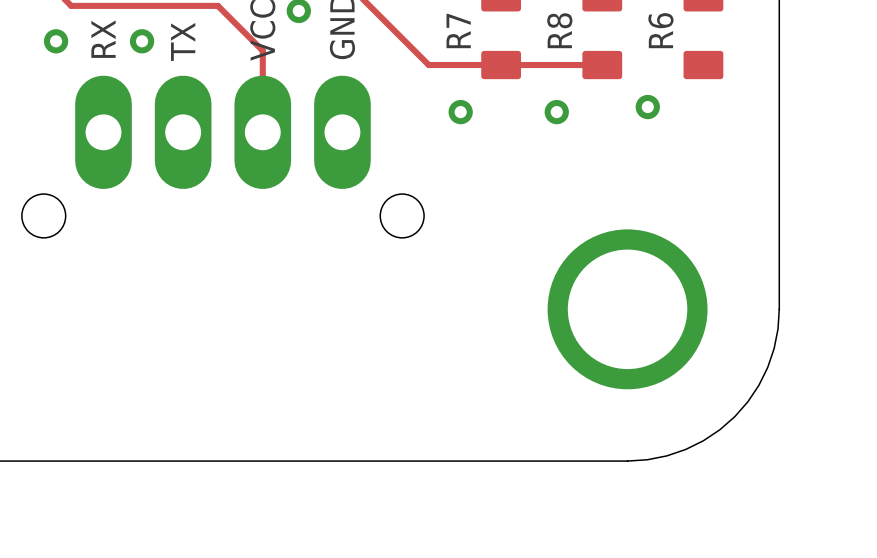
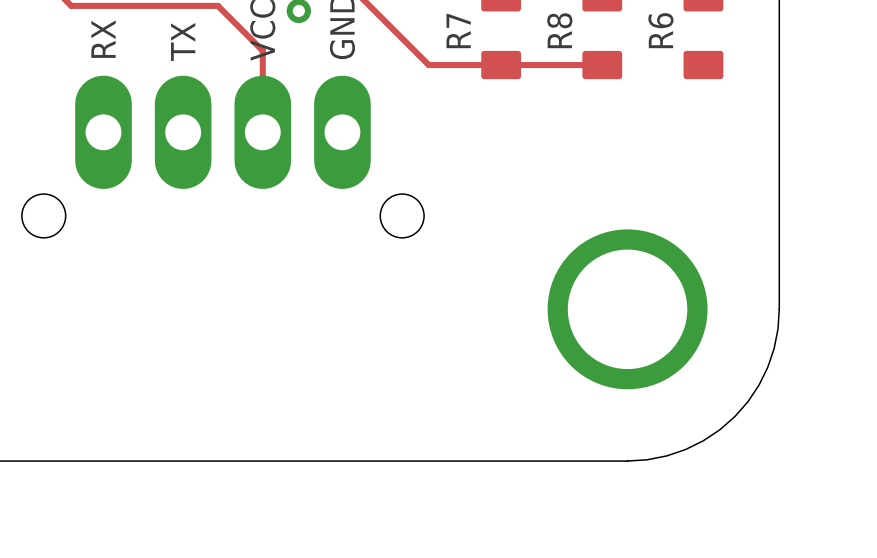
via: (56, 41) -> none
via: (142, 41) -> none
via: (647, 107) -> none
via: (460, 112) -> none
via: (556, 112) -> none

